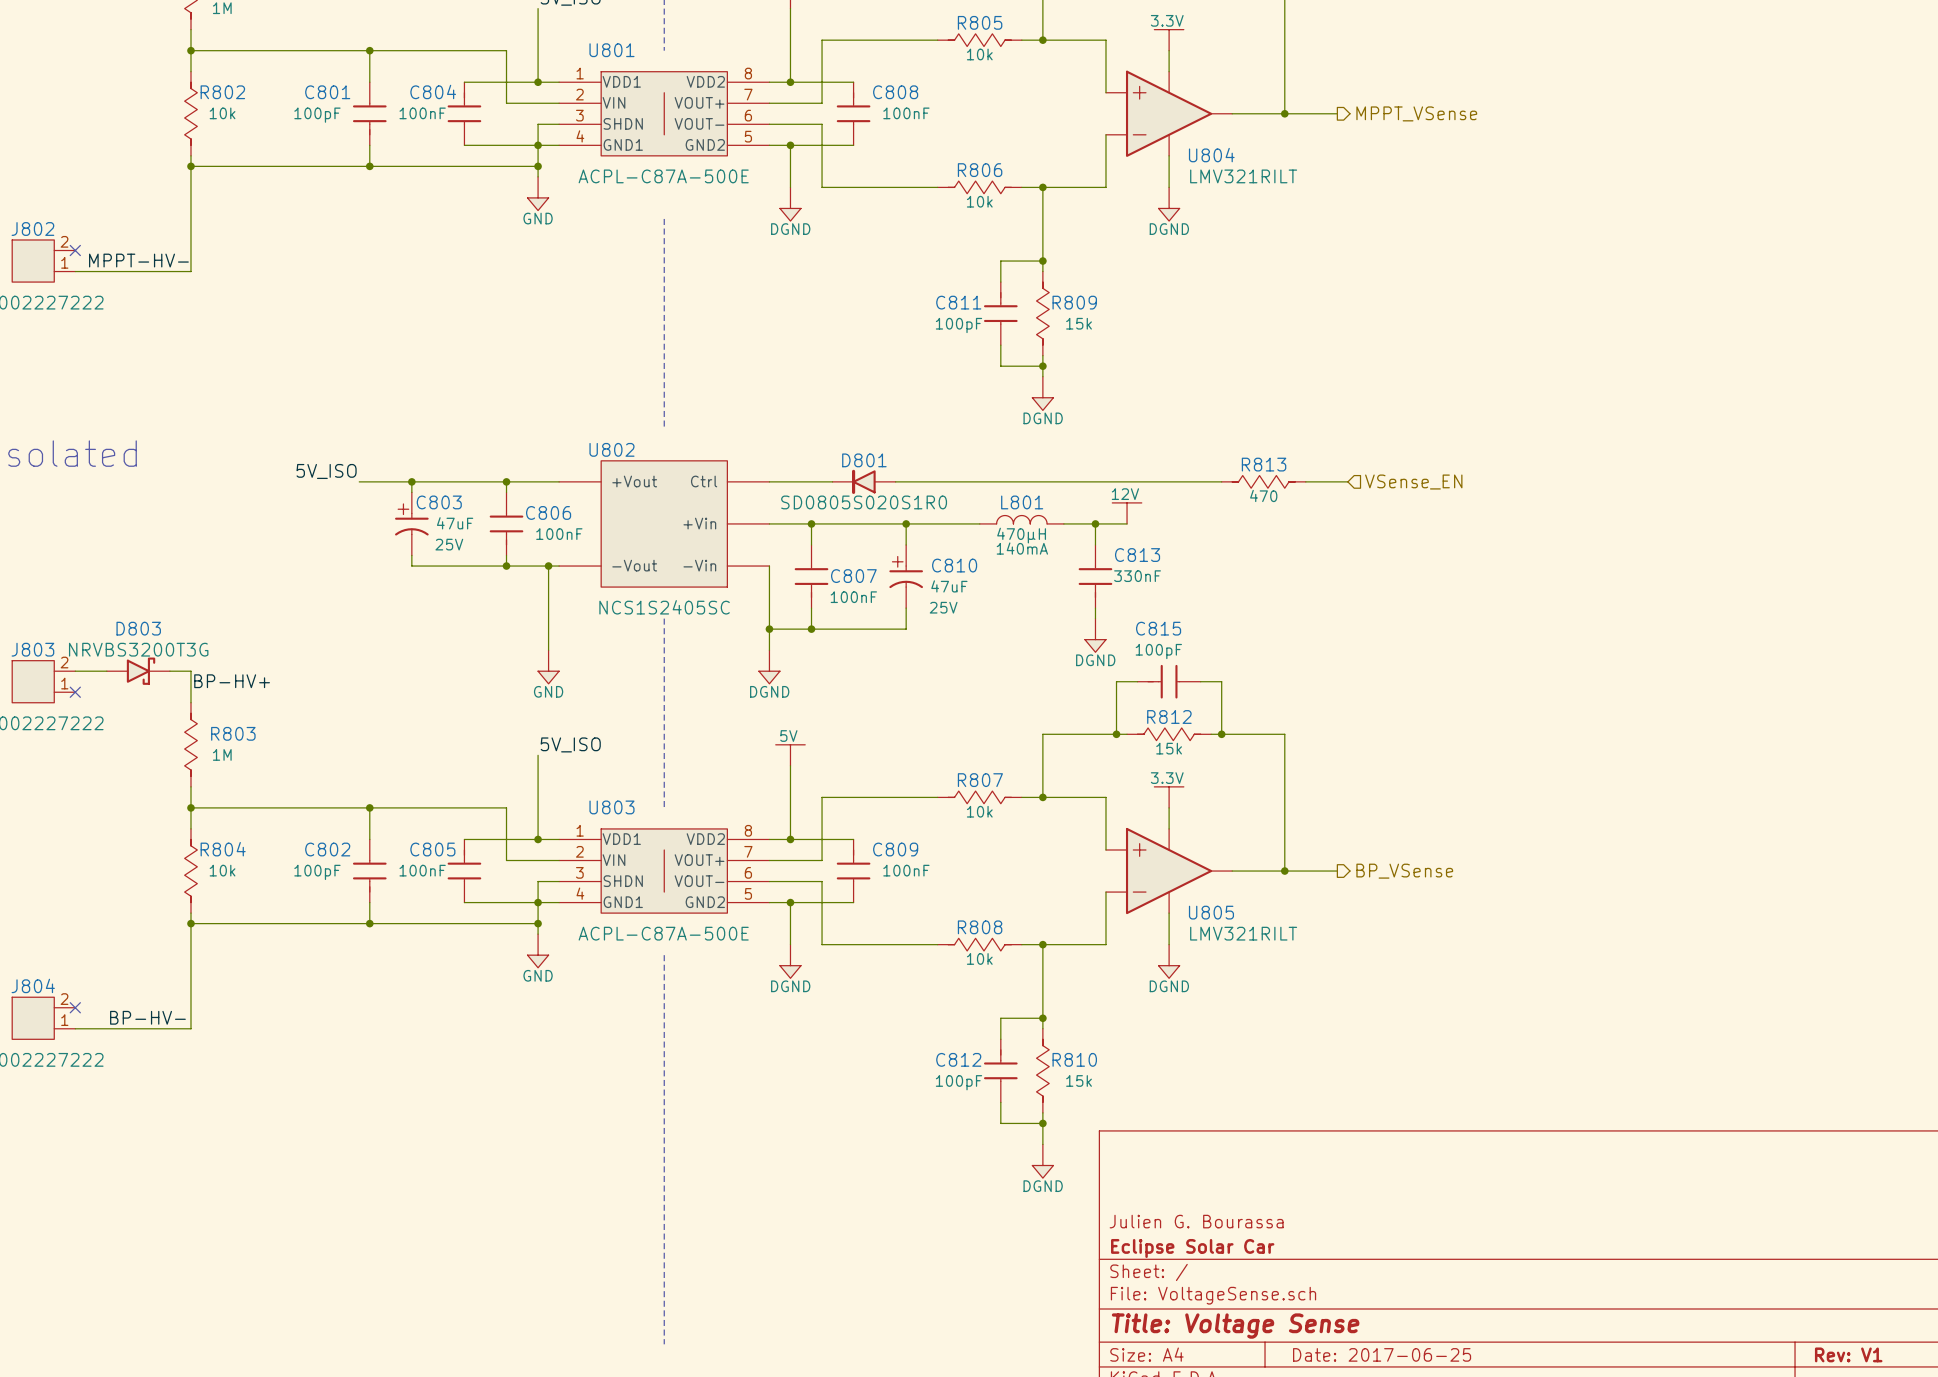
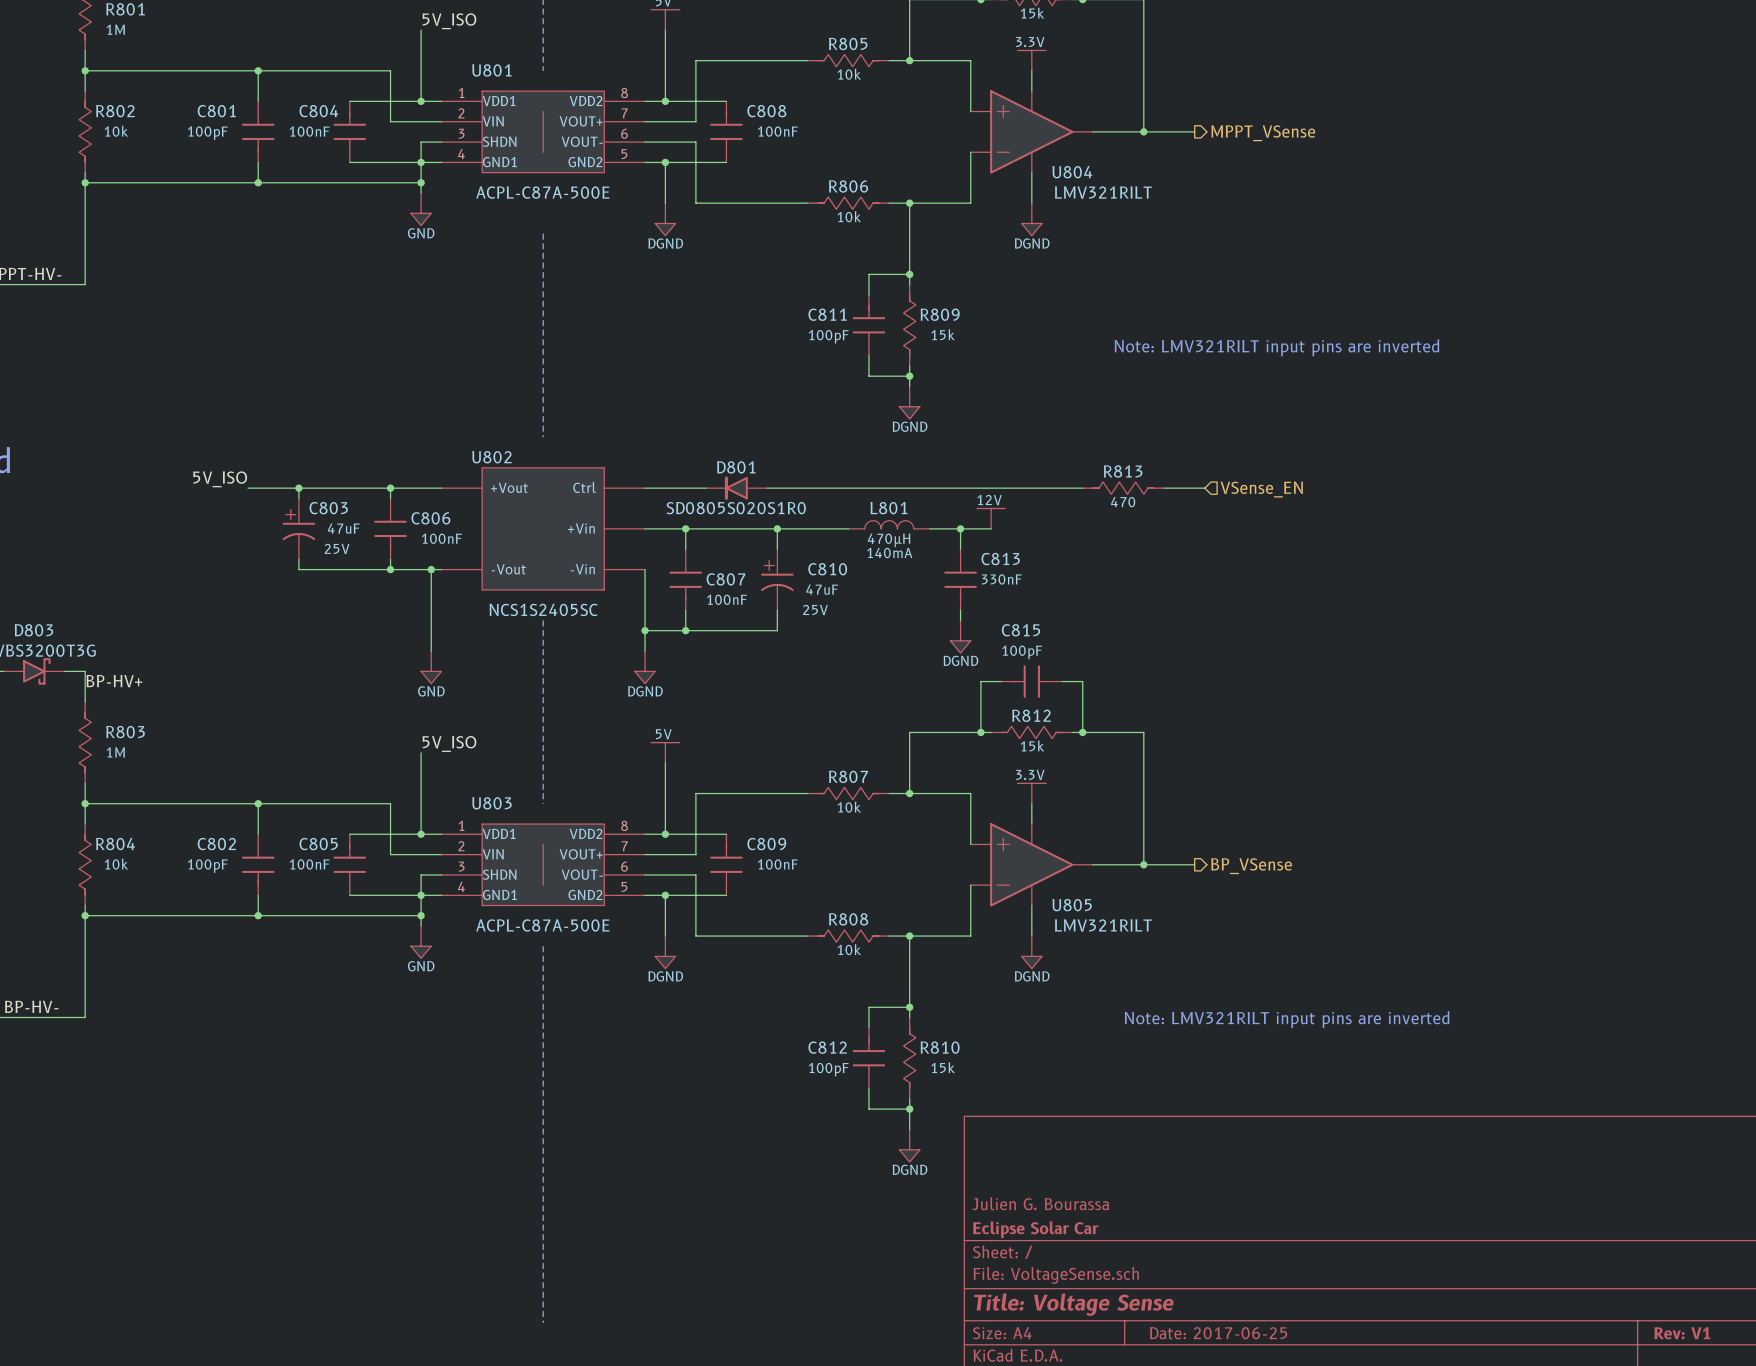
text: none -> Note: LMV321RILT input pins are inverted (1276, 347)
text: none -> Note: LMV321RILT input pins are inverted (1287, 1019)

